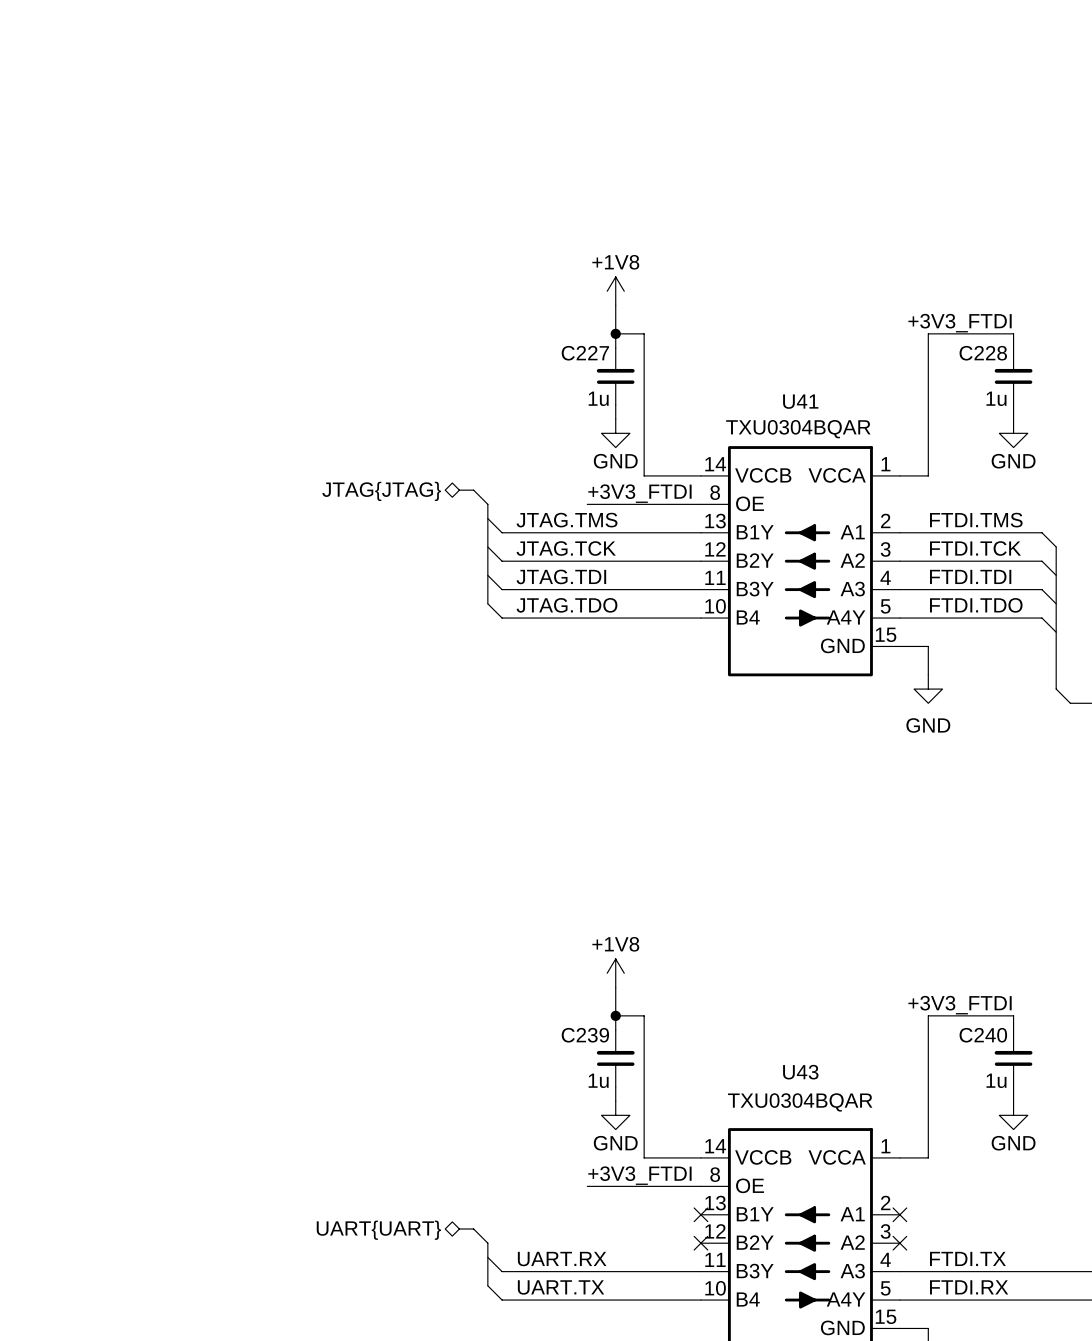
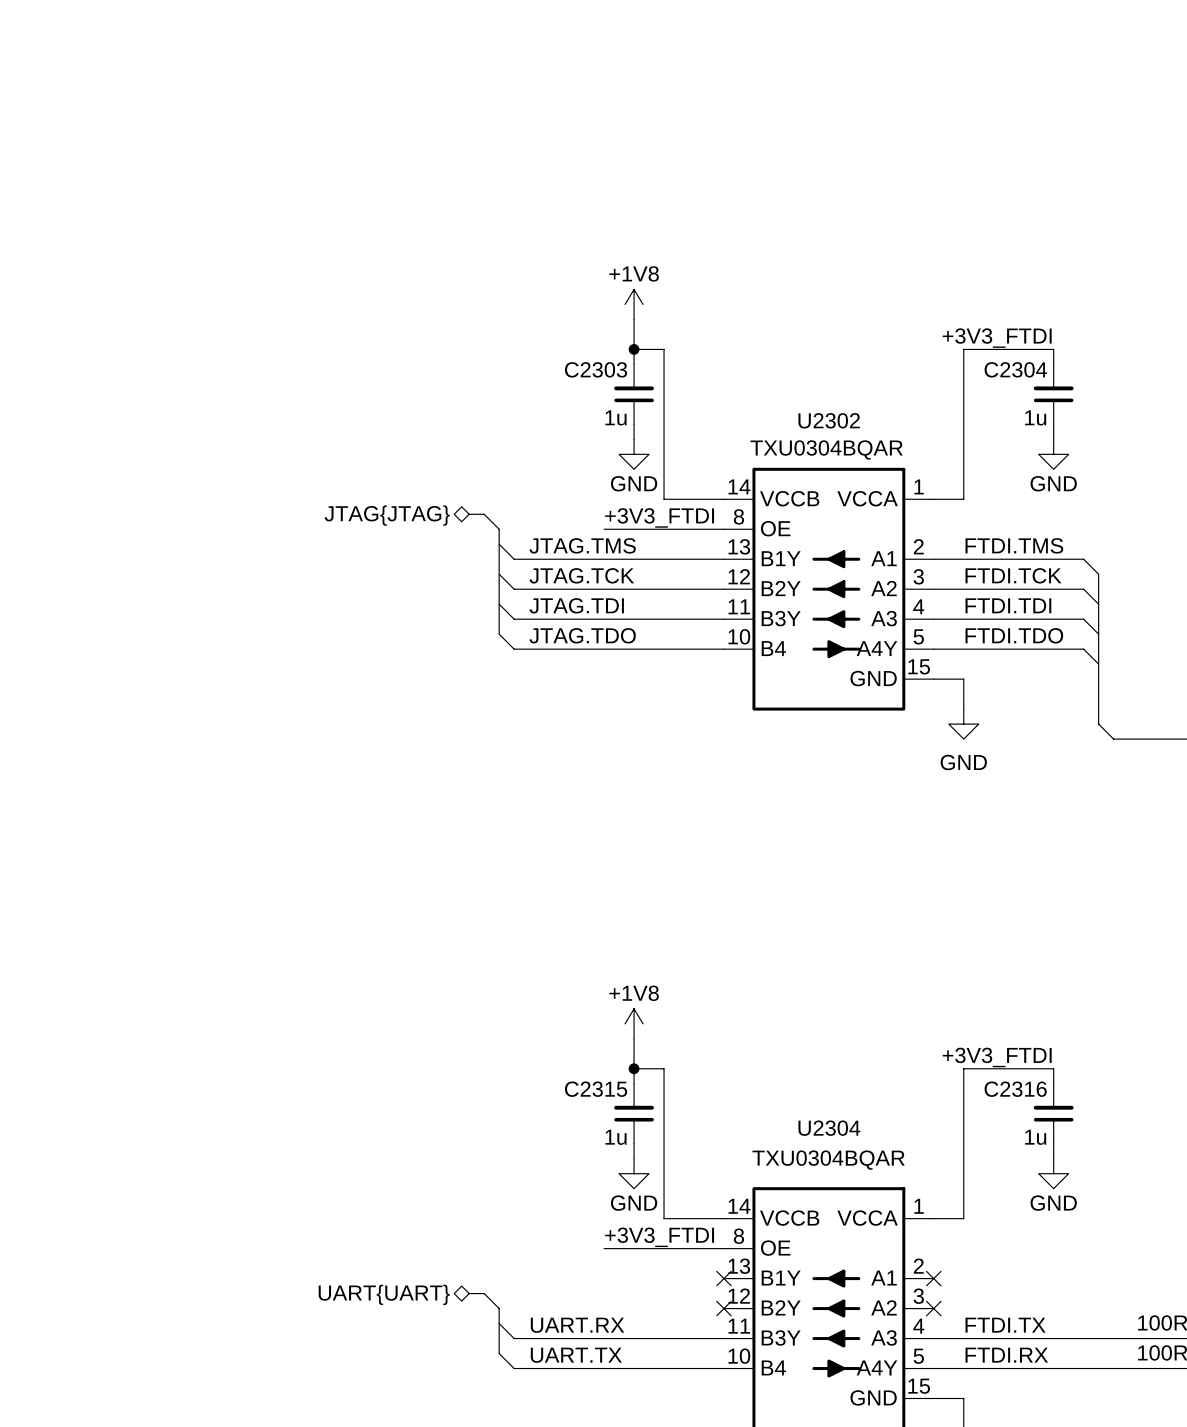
C227 name: C227 (585, 353) -> C2303 (596, 369)
C228 name: C228 (983, 353) -> C2304 (1015, 369)
U41 name: U41 (800, 401) -> U2302 (829, 420)
C239 name: C239 (585, 1035) -> C2315 (596, 1089)
C240 name: C240 (983, 1035) -> C2316 (1015, 1089)
U43 name: U43 (800, 1072) -> U2304 (829, 1128)

